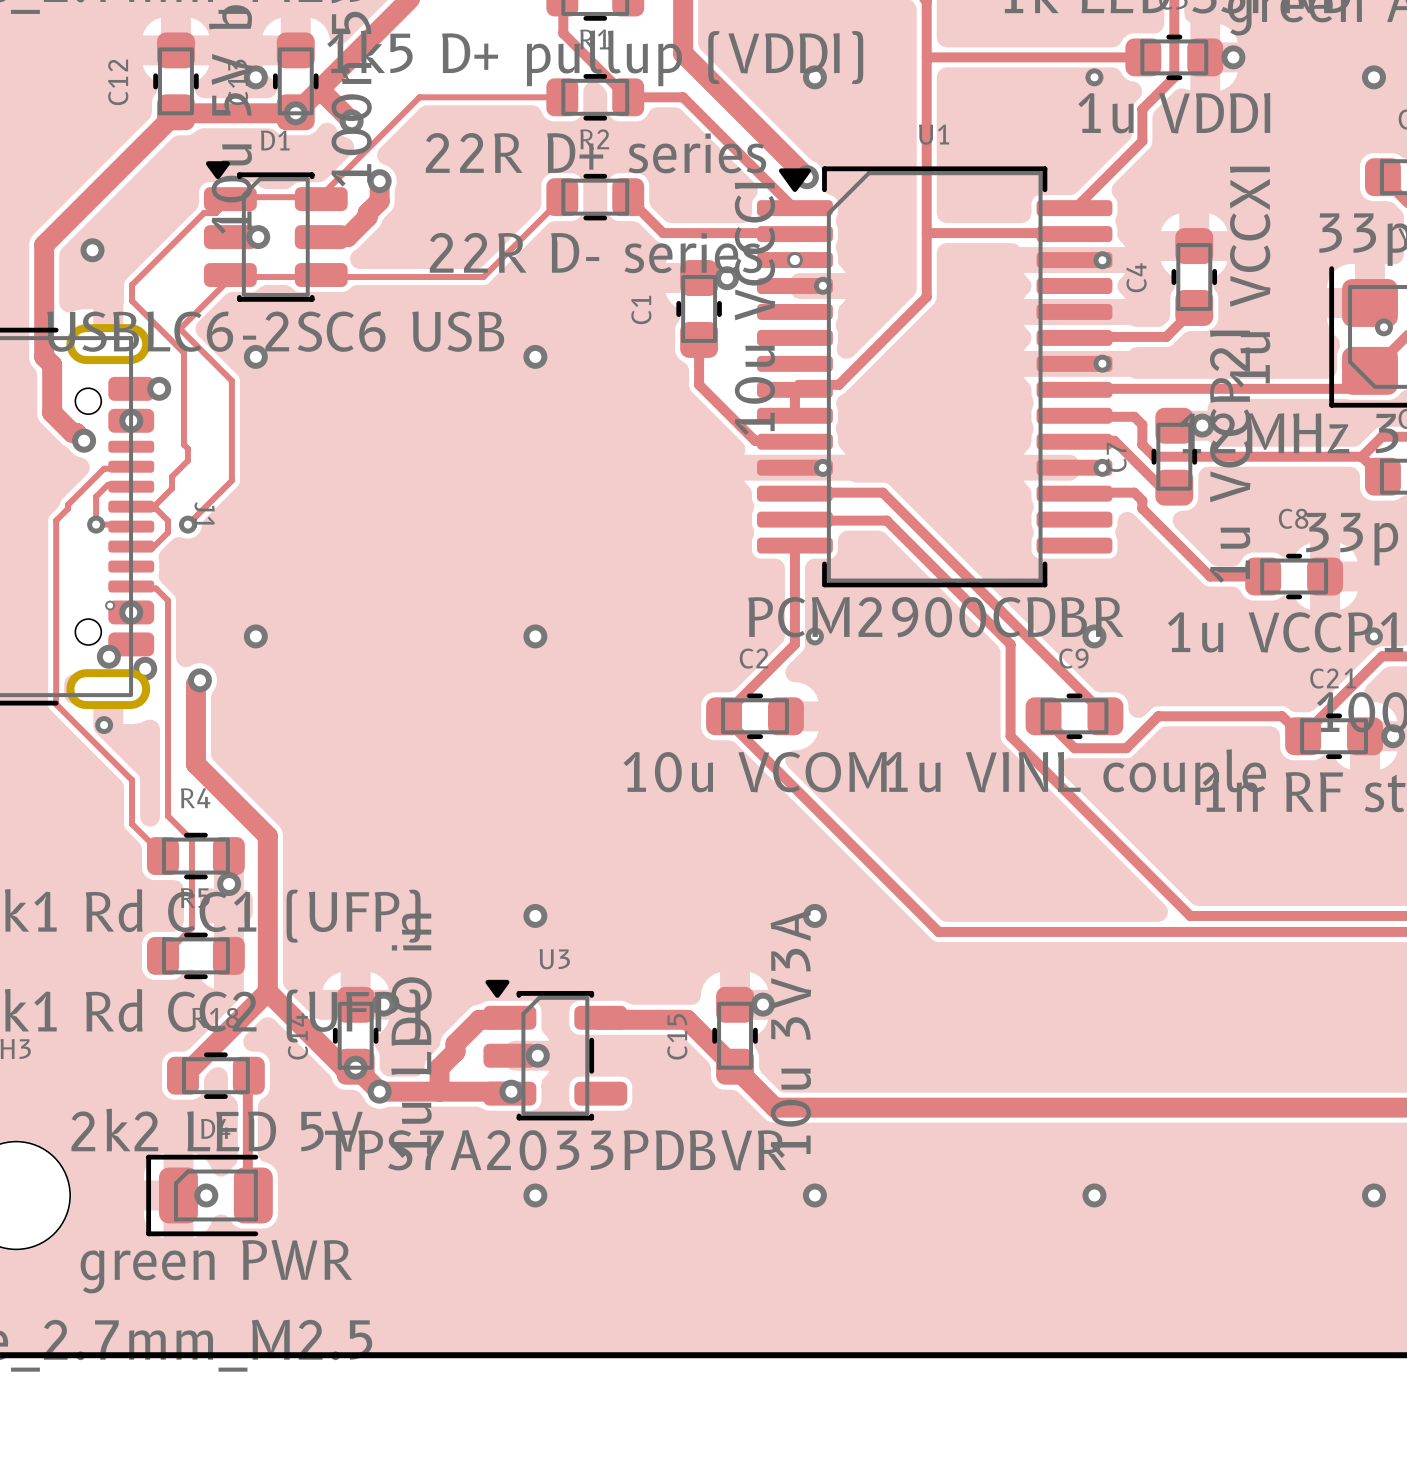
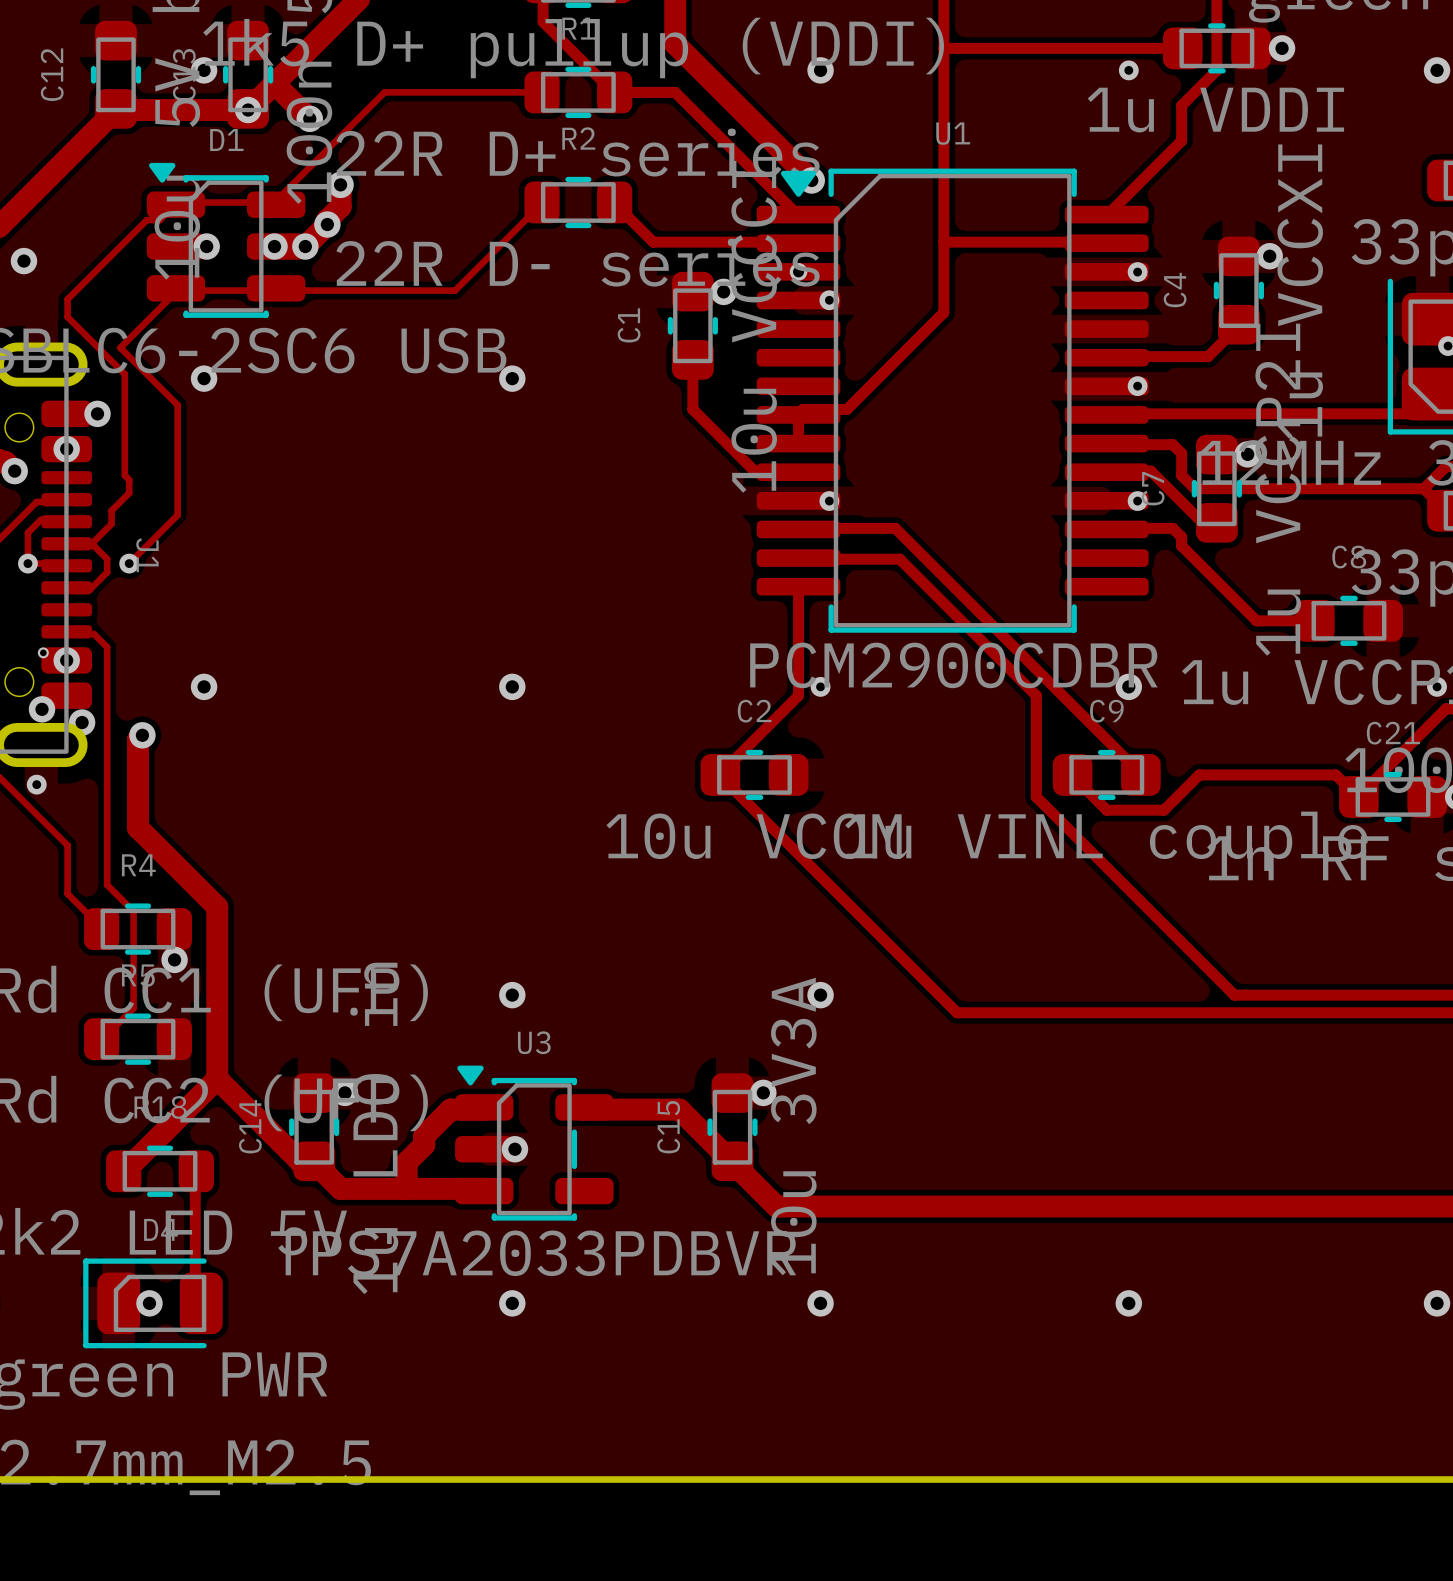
via: none -> (327, 224)
via: none -> (274, 246)
via: none -> (305, 246)
via: none -> (1269, 256)
via: (355, 1067) -> none
via: (379, 1091) -> none
via: (511, 1091) -> none

